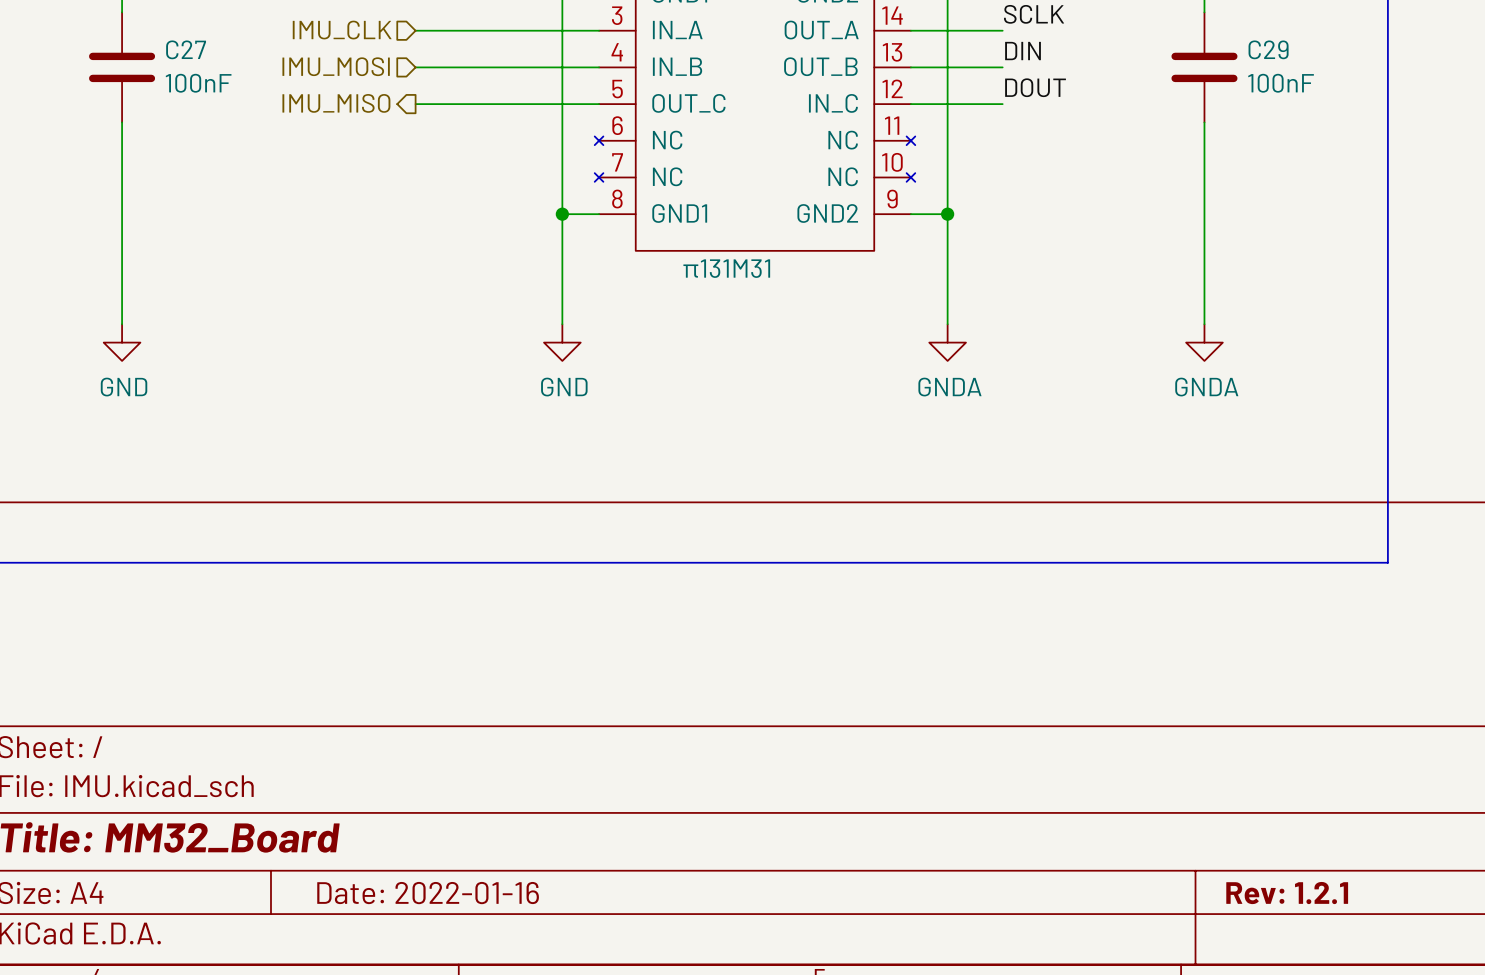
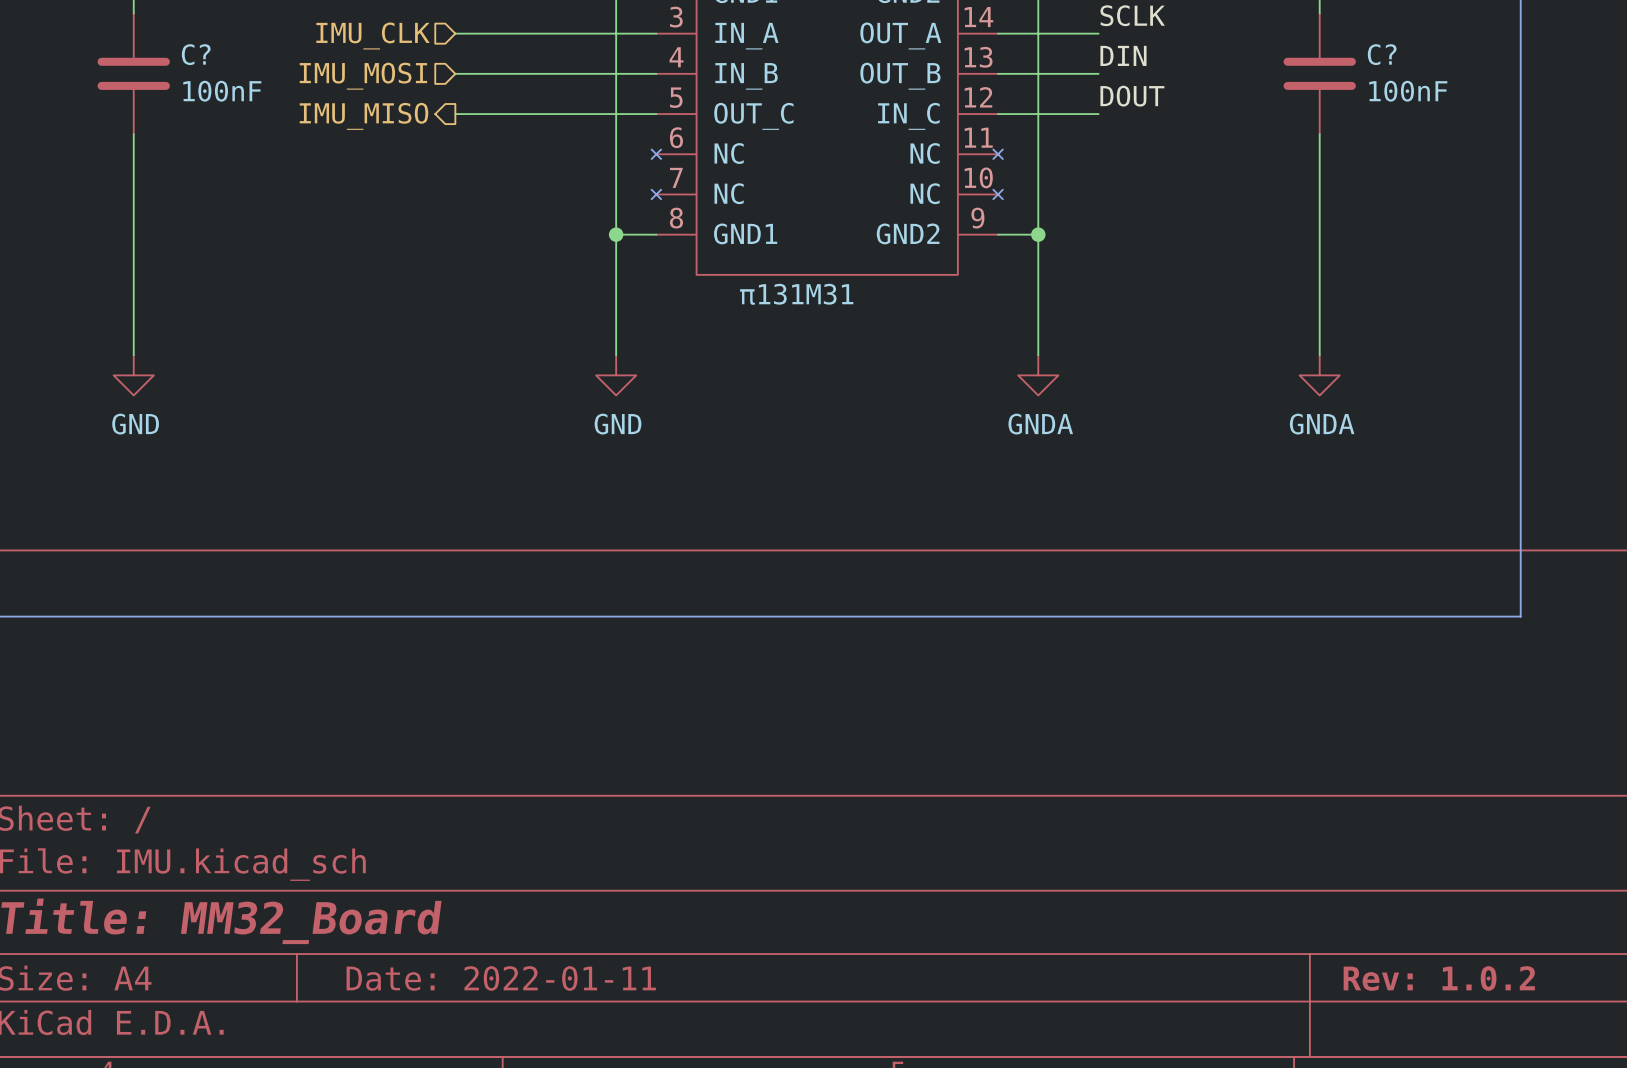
C27 name: C27 (186, 49) -> C? (196, 54)
C29 name: C29 (1268, 49) -> C? (1382, 54)
title block: Date: 2022-01-16 (428, 893) -> Date: 2022-01-11 (501, 978)
title block: Rev: 1.2.1 (1287, 893) -> Rev: 1.0.2 (1439, 978)

